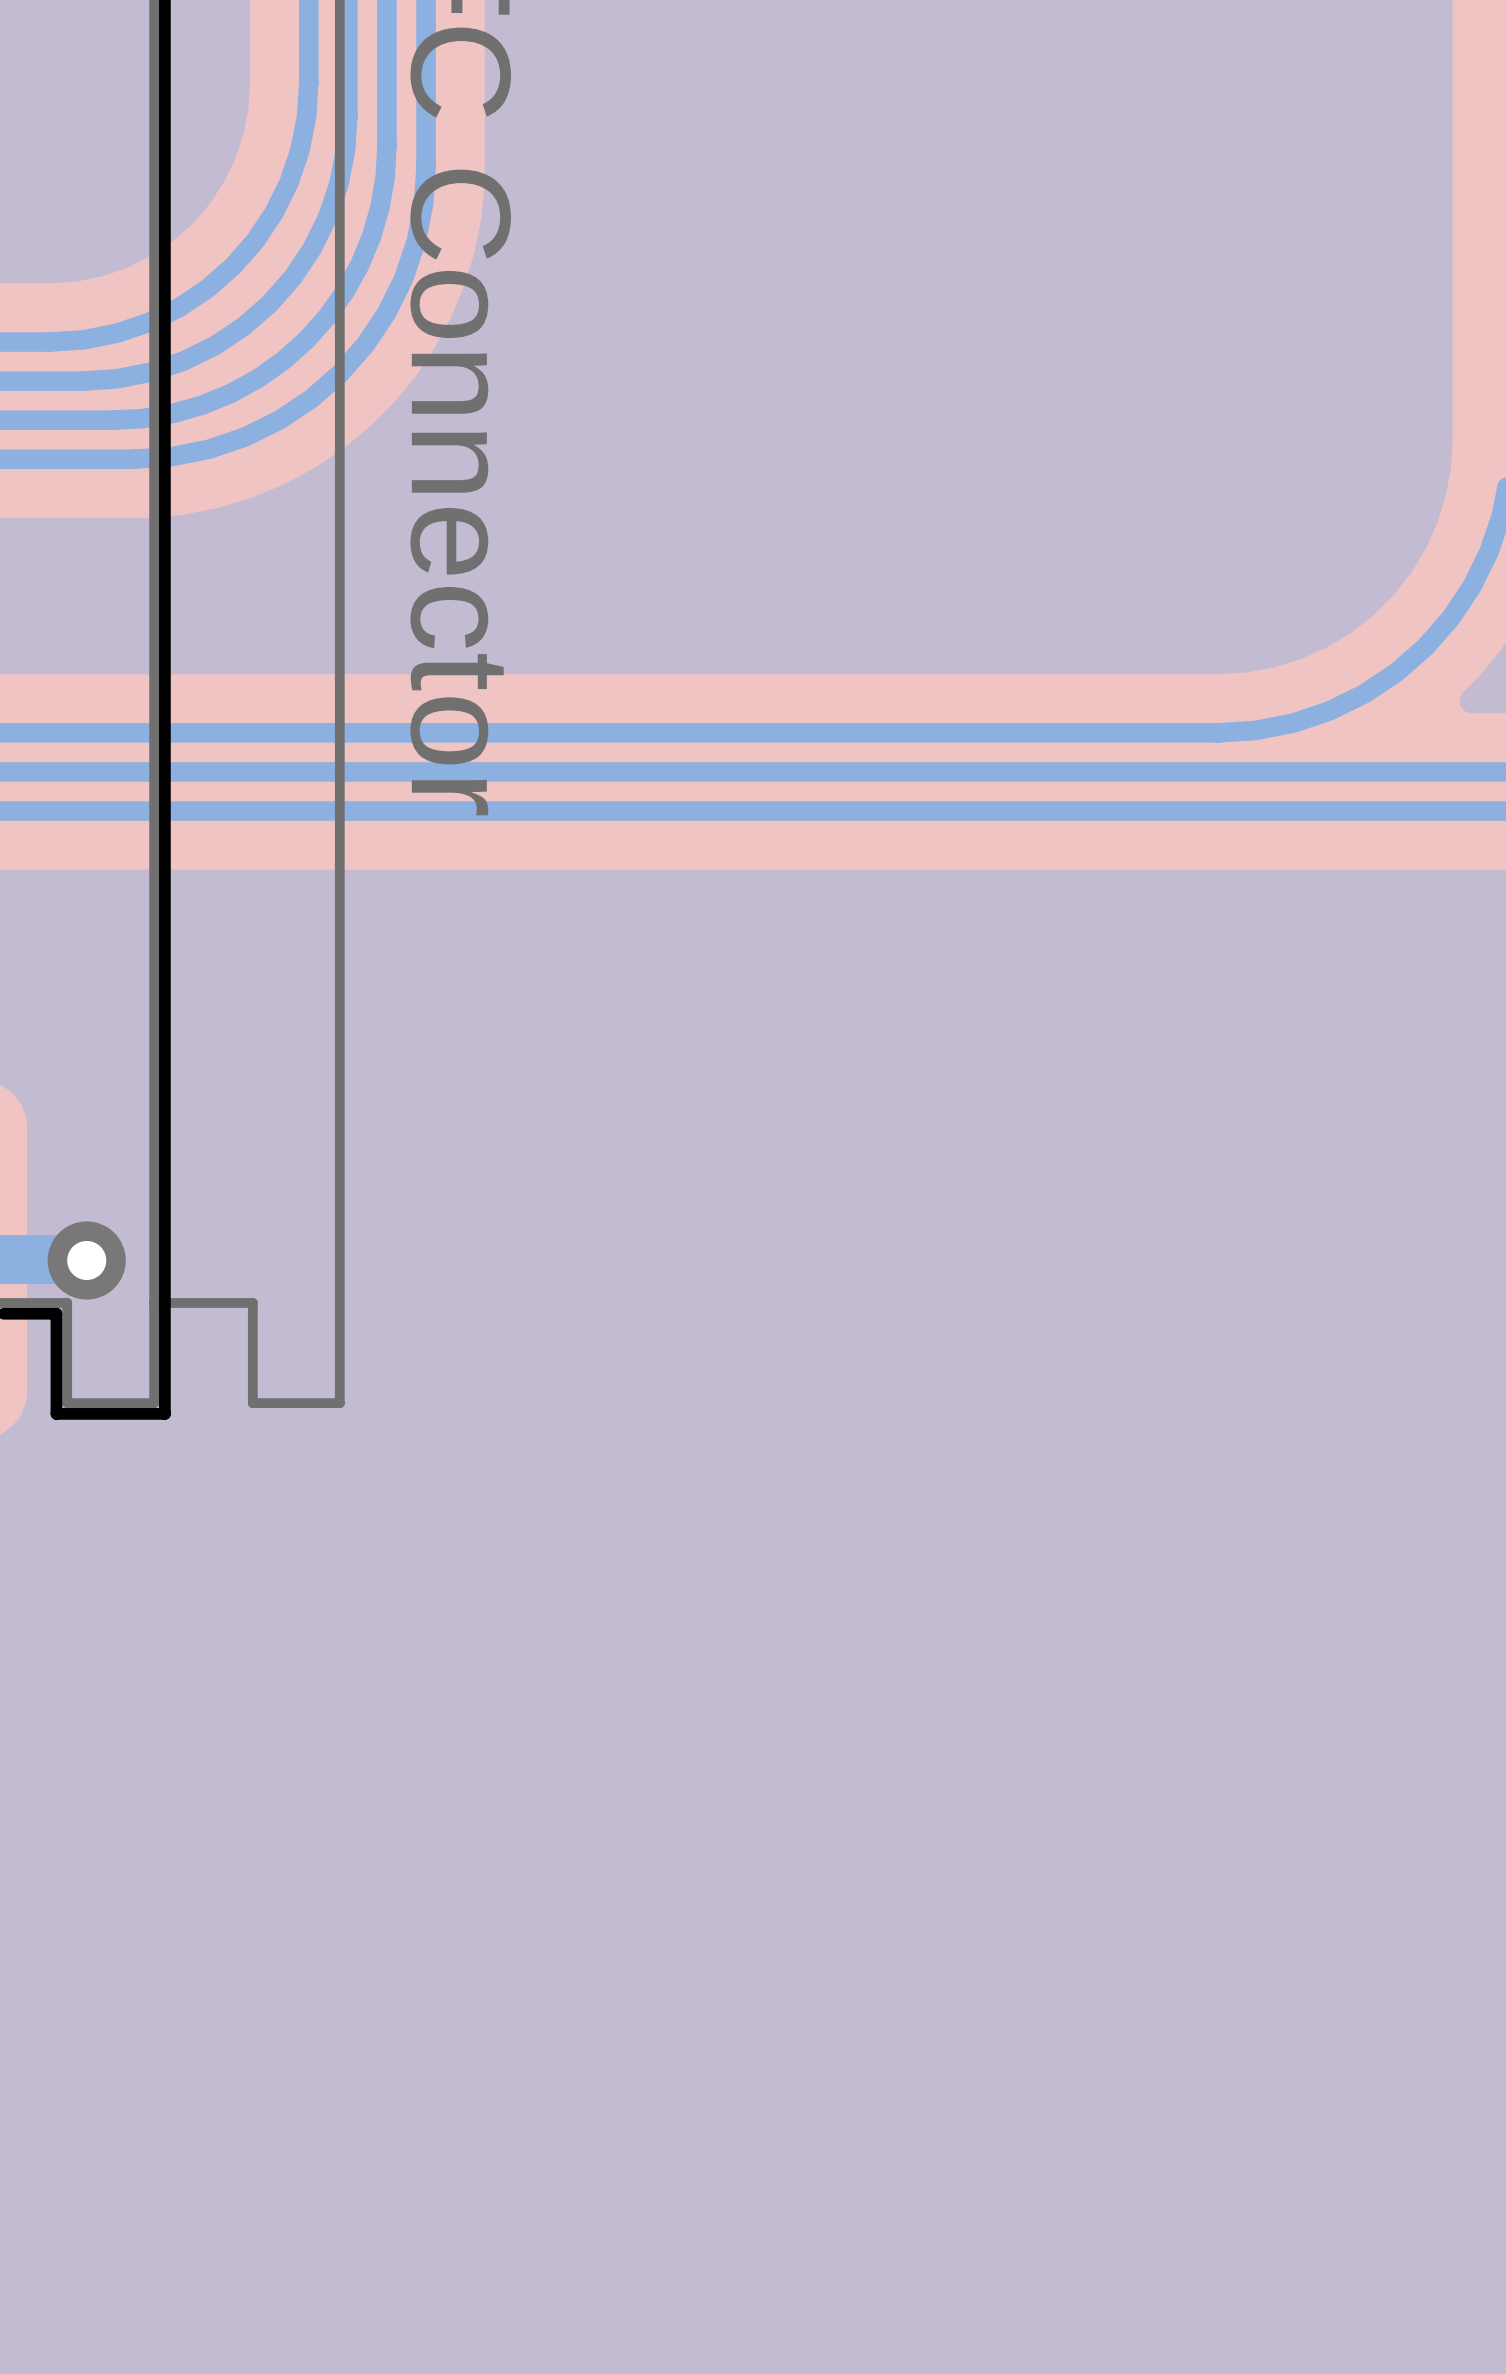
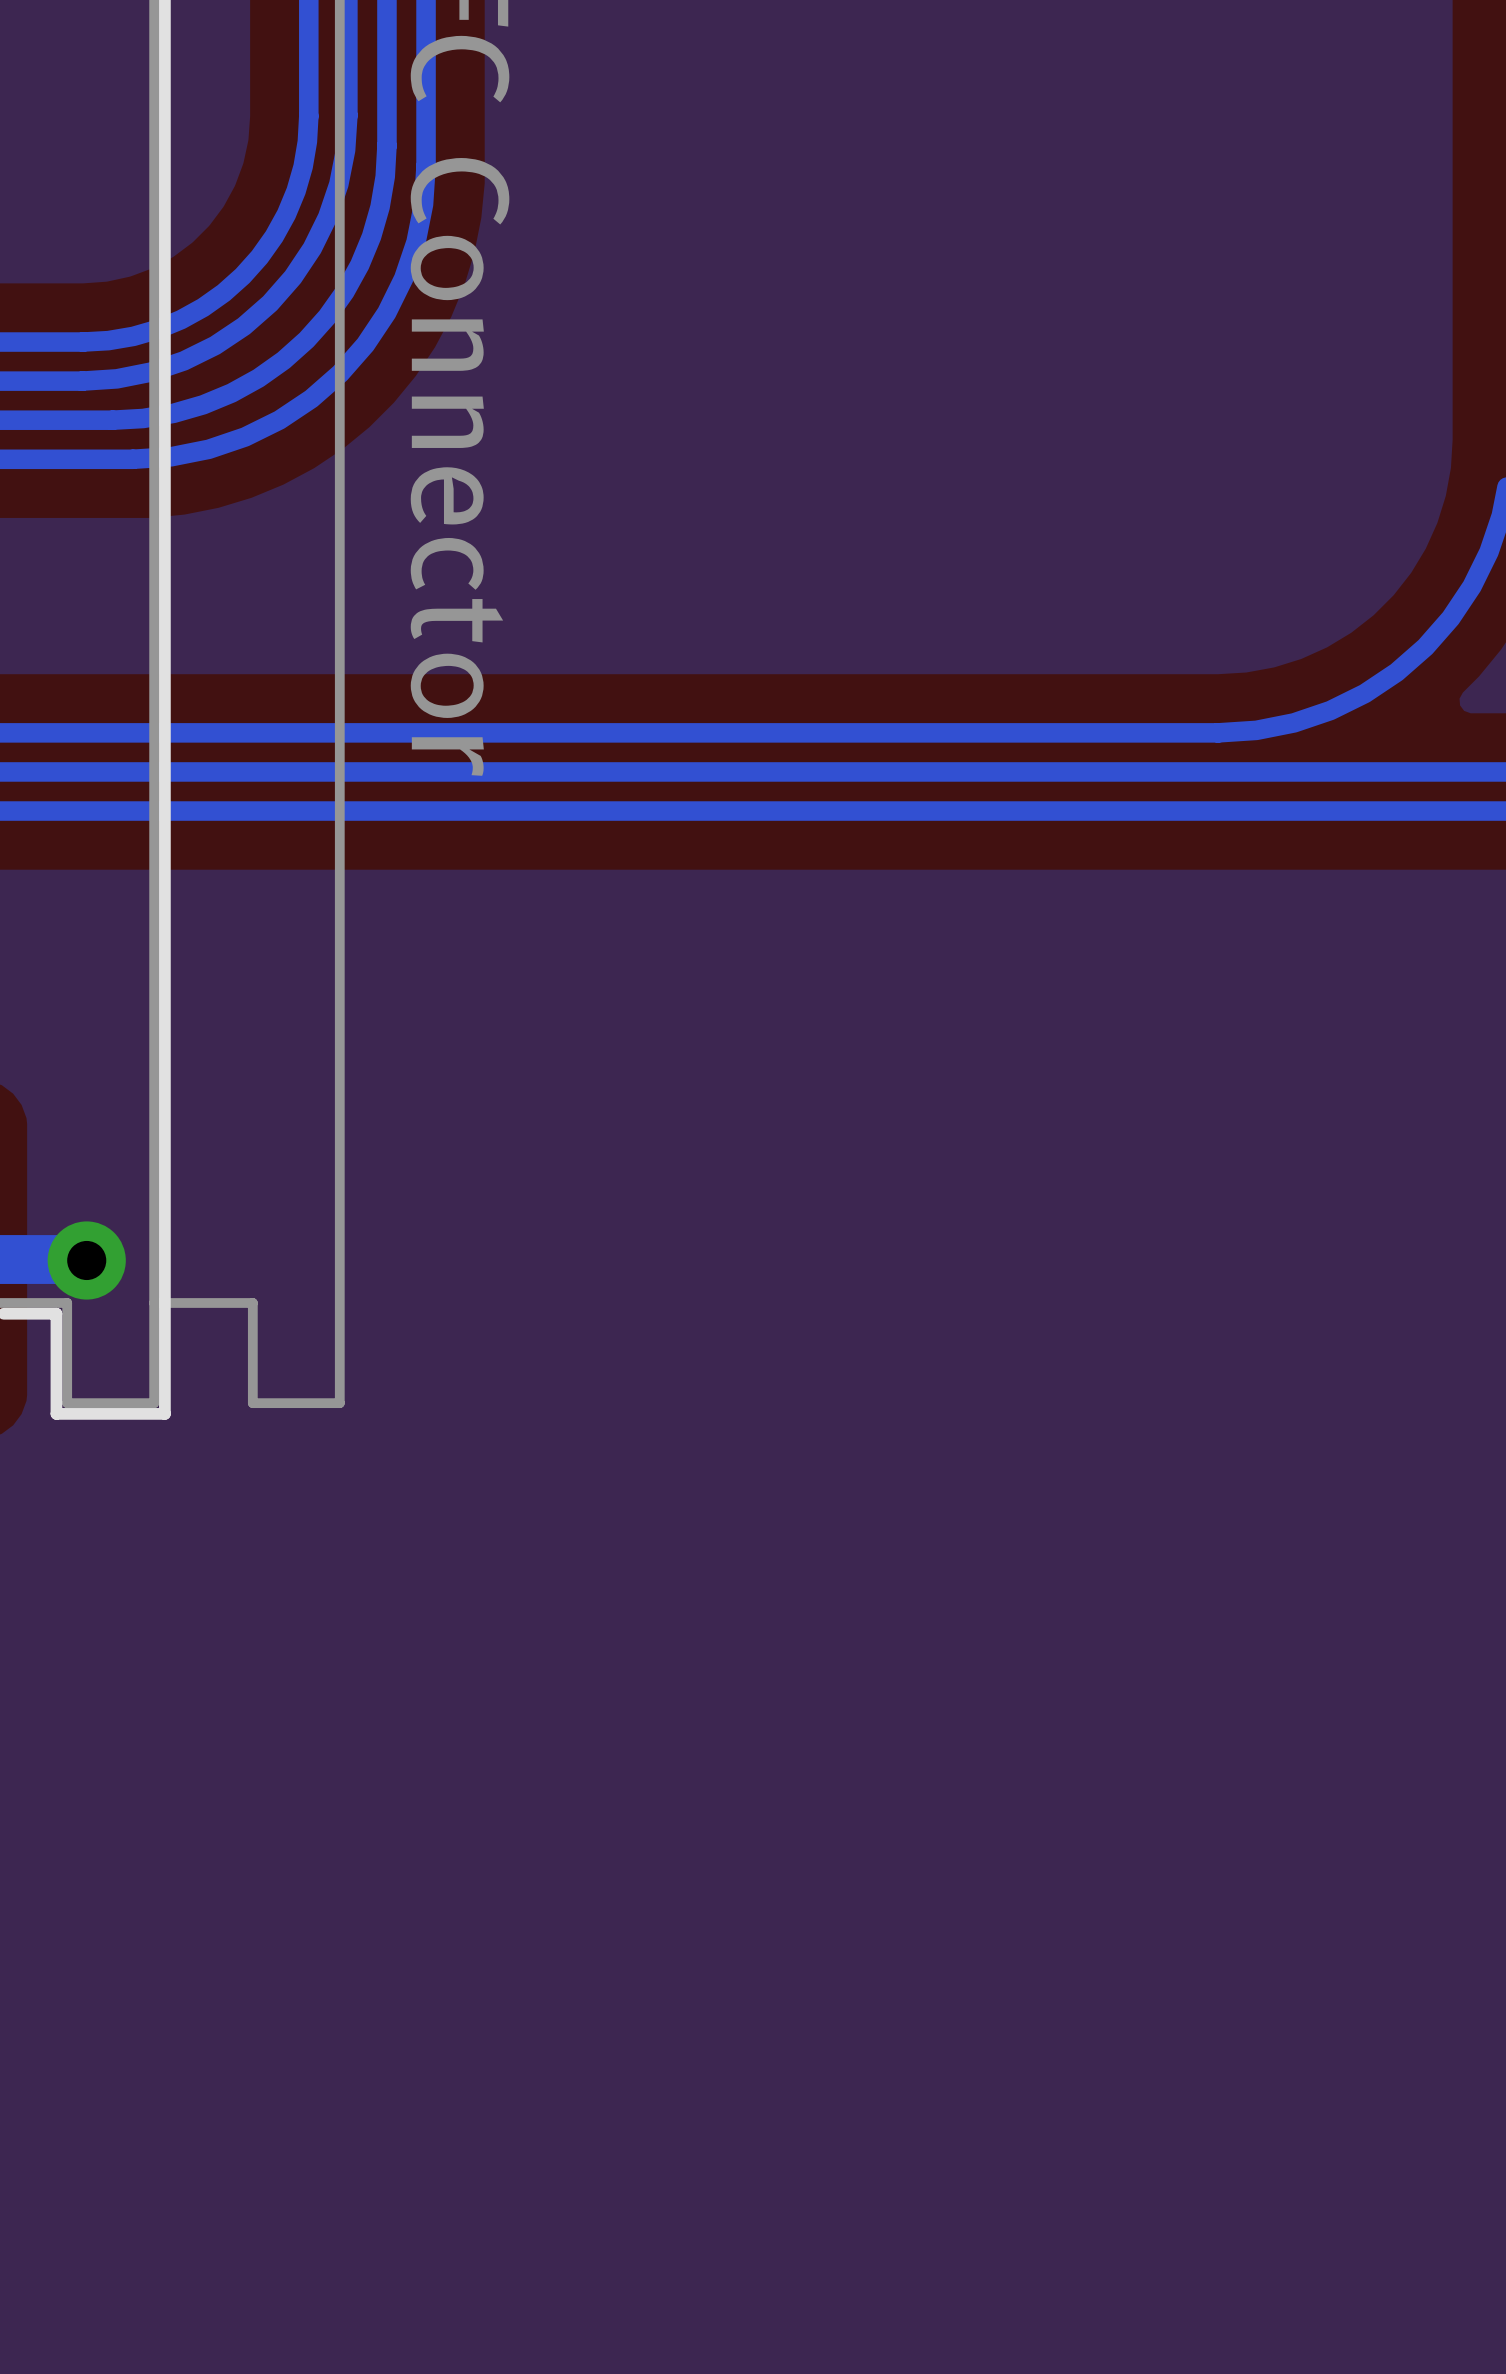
bottom track: (308, 83) (306, 117) (299, 150) (289, 182) (274, 212) (255, 240) (233, 266) (207, 288) (179, 307) (149, 322) (116, 333) (83, 339) (50, 342) -> (308, 83) (307, 141) (296, 190) (274, 236) (242, 275) (203, 307) (157, 329) (108, 340) (50, 342)

